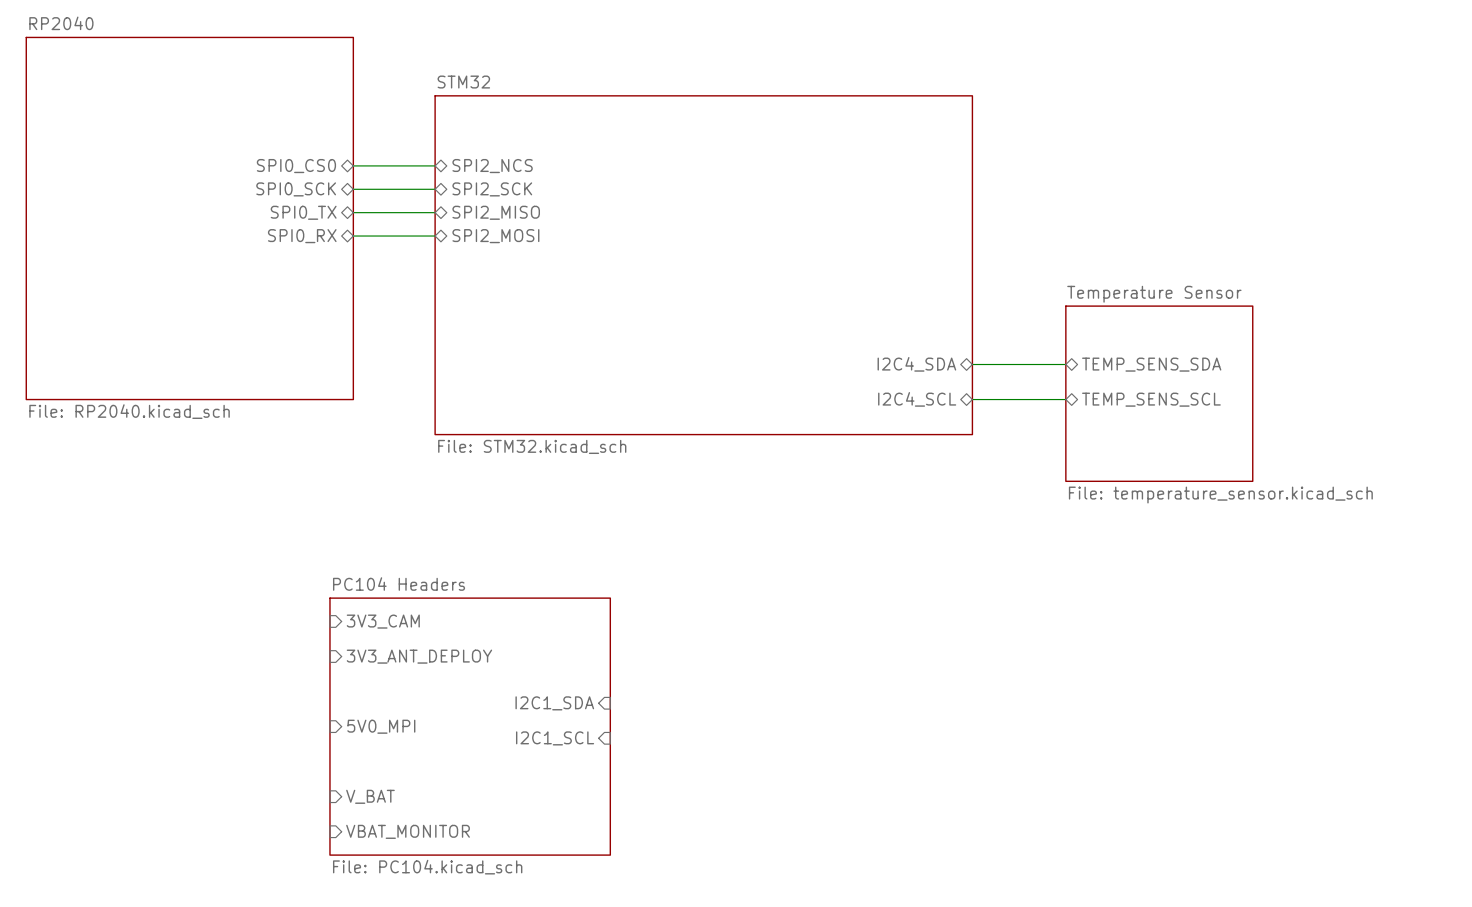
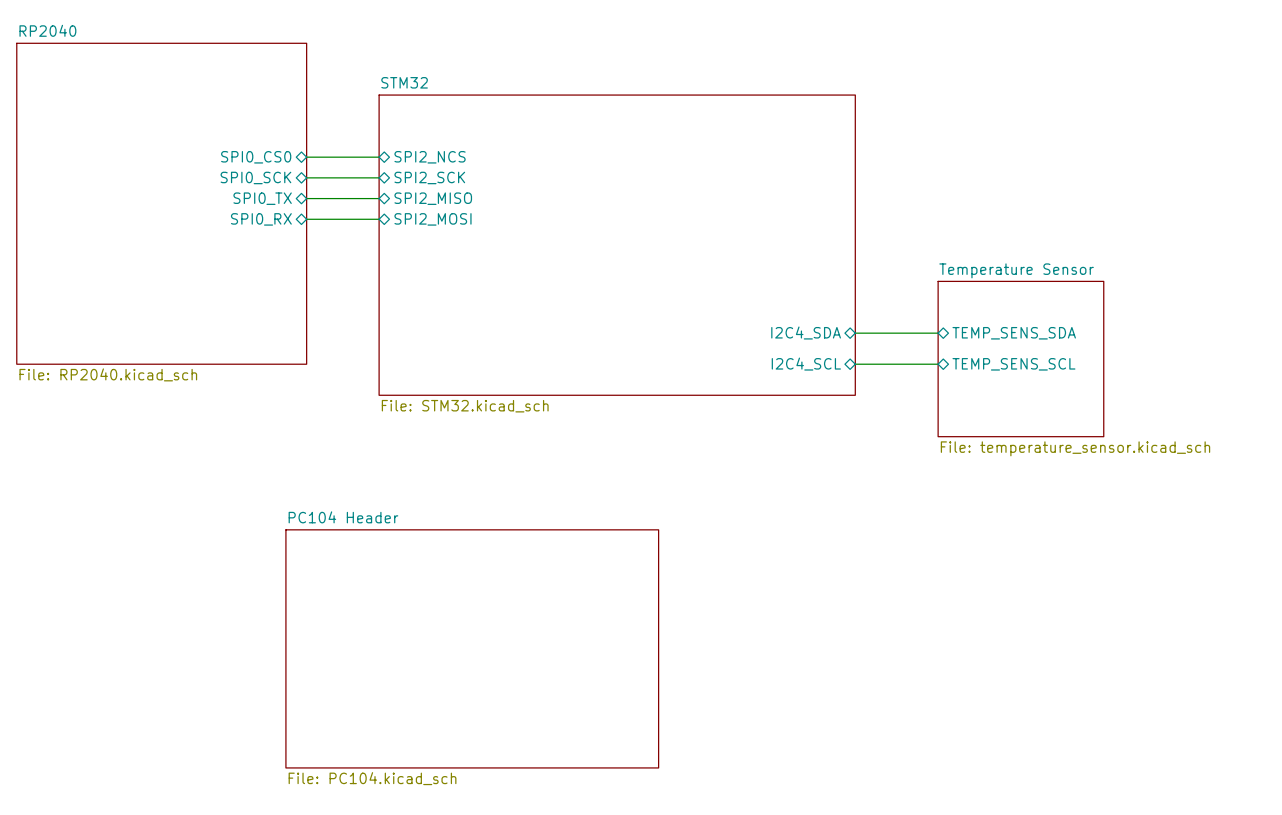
sheet pin: 3V3_CAM (383, 621) -> none
sheet pin: 3V3_ANT_DEPLOY (419, 656) -> none
sheet pin: I2C1_SDA (554, 703) -> none
sheet PC104 Header: none -> File: PC104.kicad_sch (472, 648)
sheet pin: 5V0_MPI (381, 726) -> none
sheet PC104 Headers: File: PC104.kicad_sch (470, 726) -> none
sheet pin: I2C1_SCL (555, 738) -> none
sheet pin: V_BAT (370, 796) -> none
sheet pin: VBAT_MONITOR (408, 831) -> none

